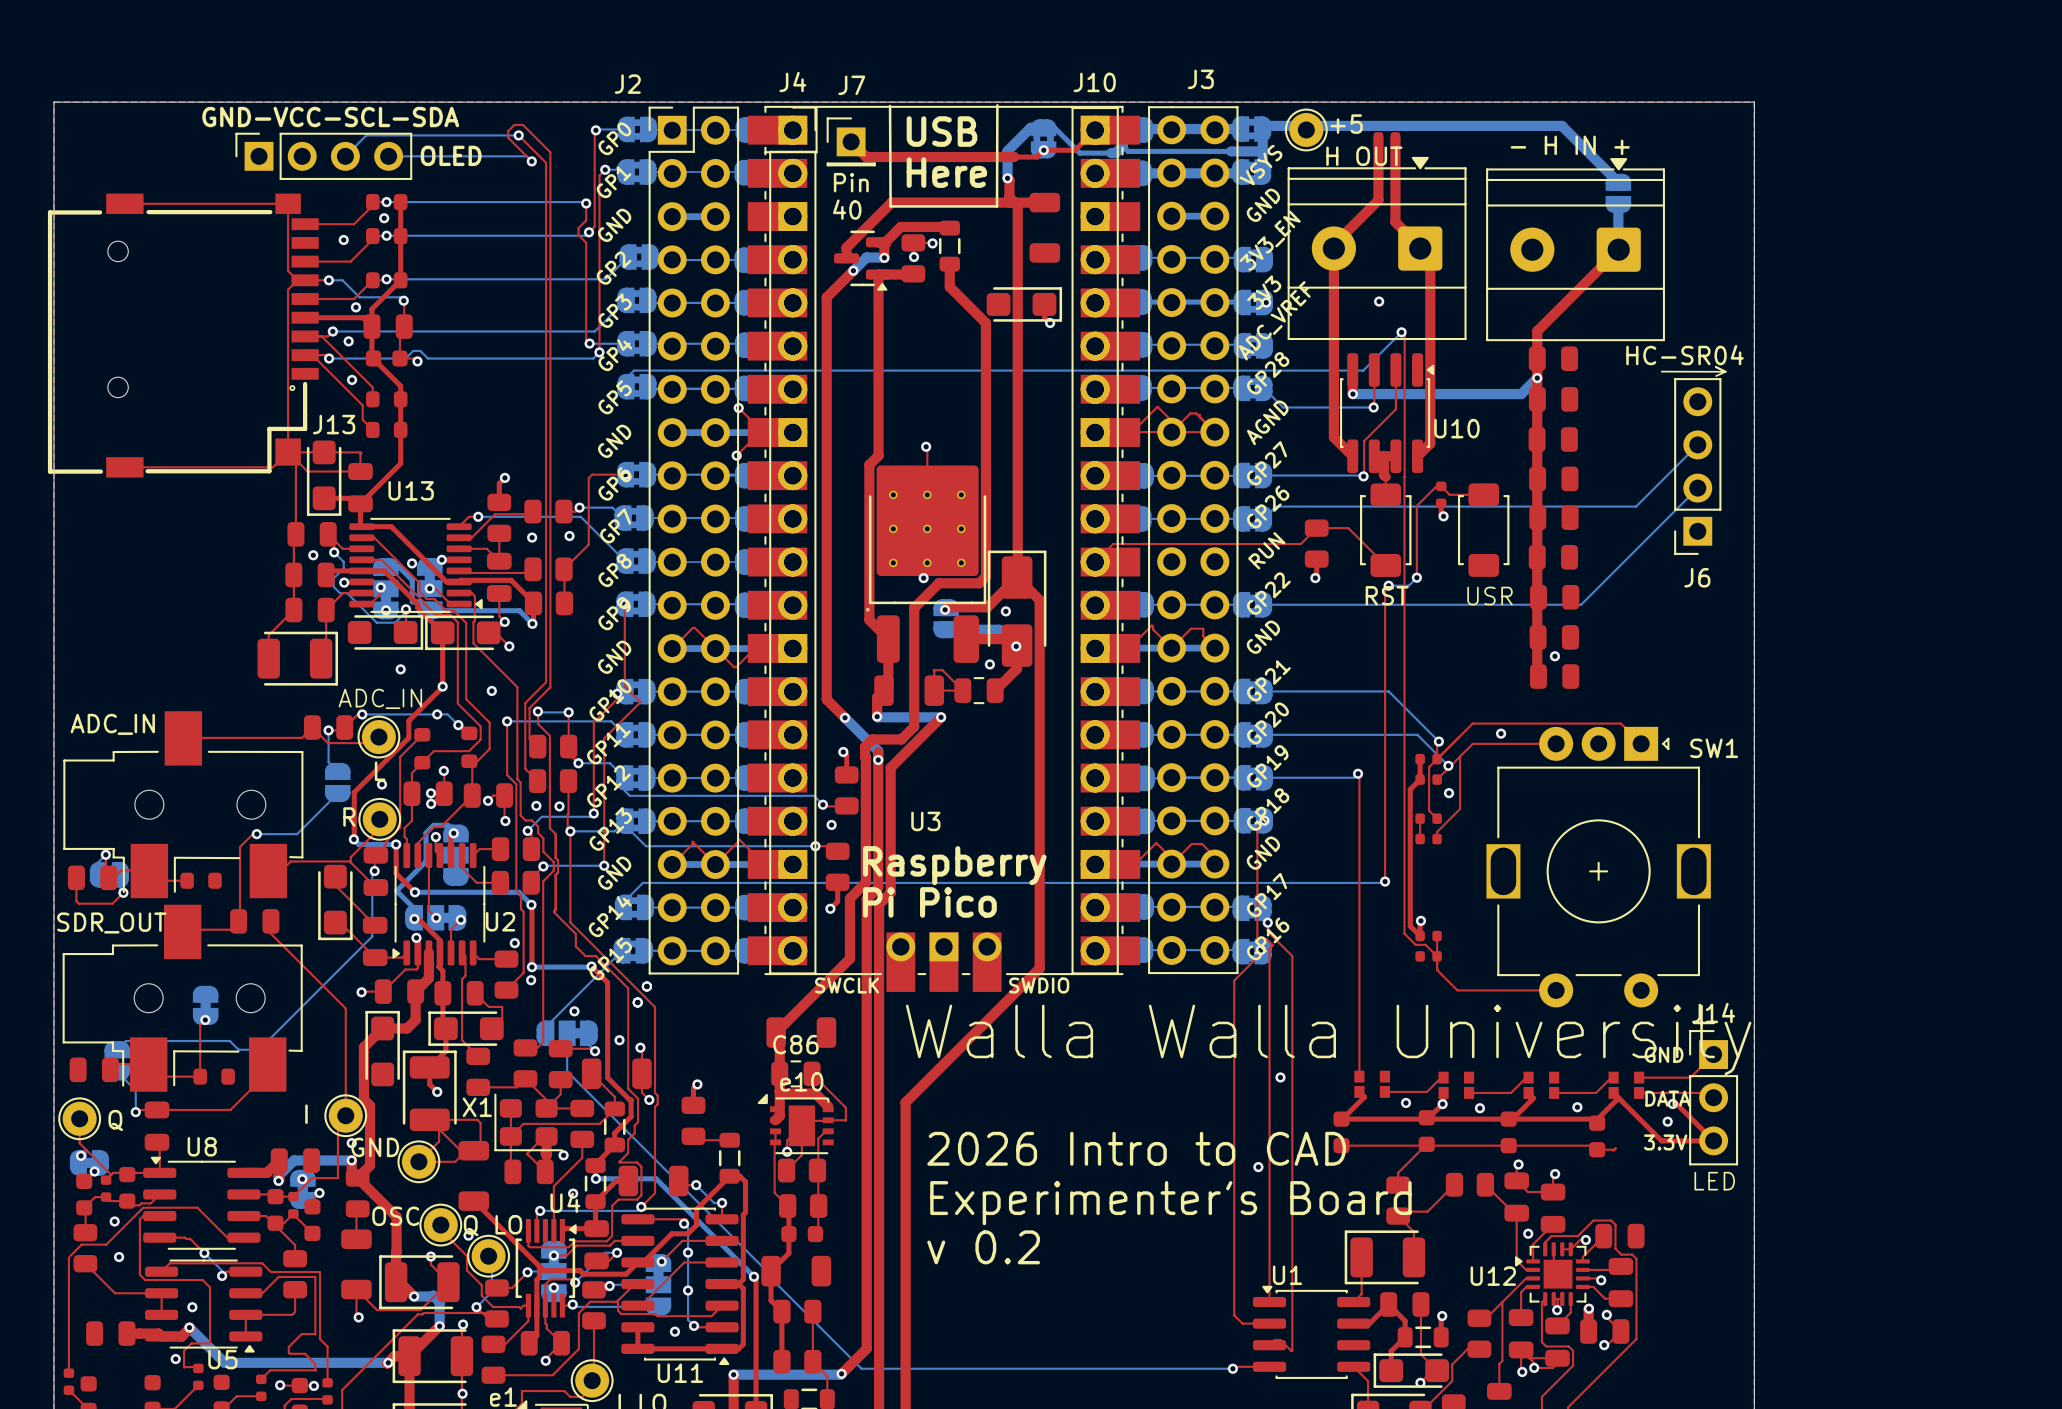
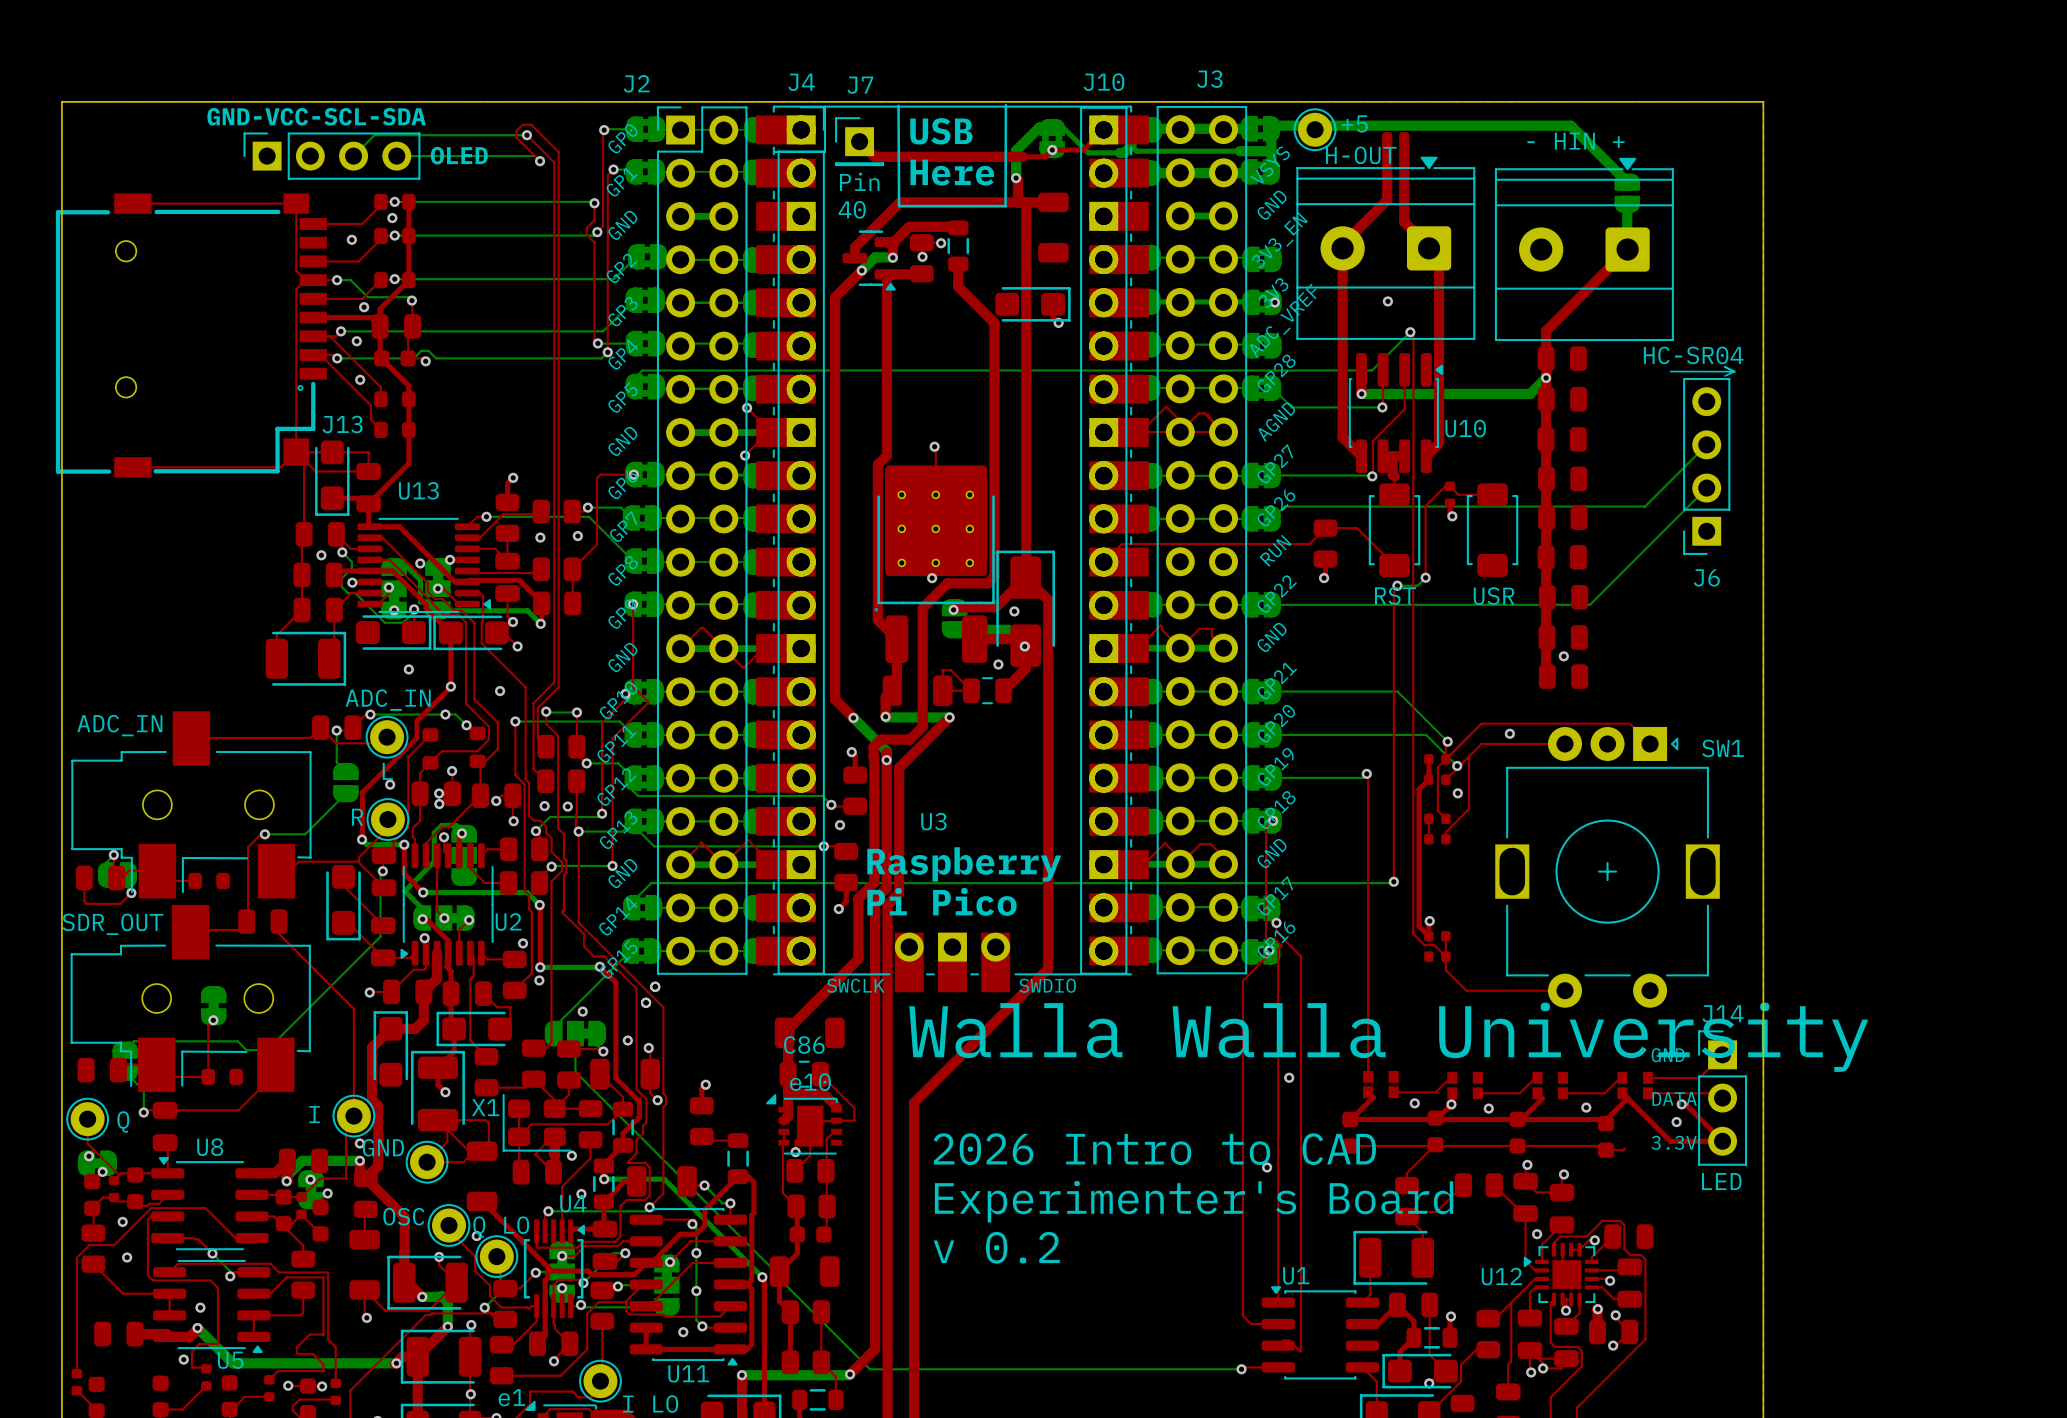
text: none -> - HIN + (1575, 141)
part value: - H IN + (1570, 145) -> none
text: none -> H-OUT (1361, 155)
part value: H OUT (1364, 156) -> none

